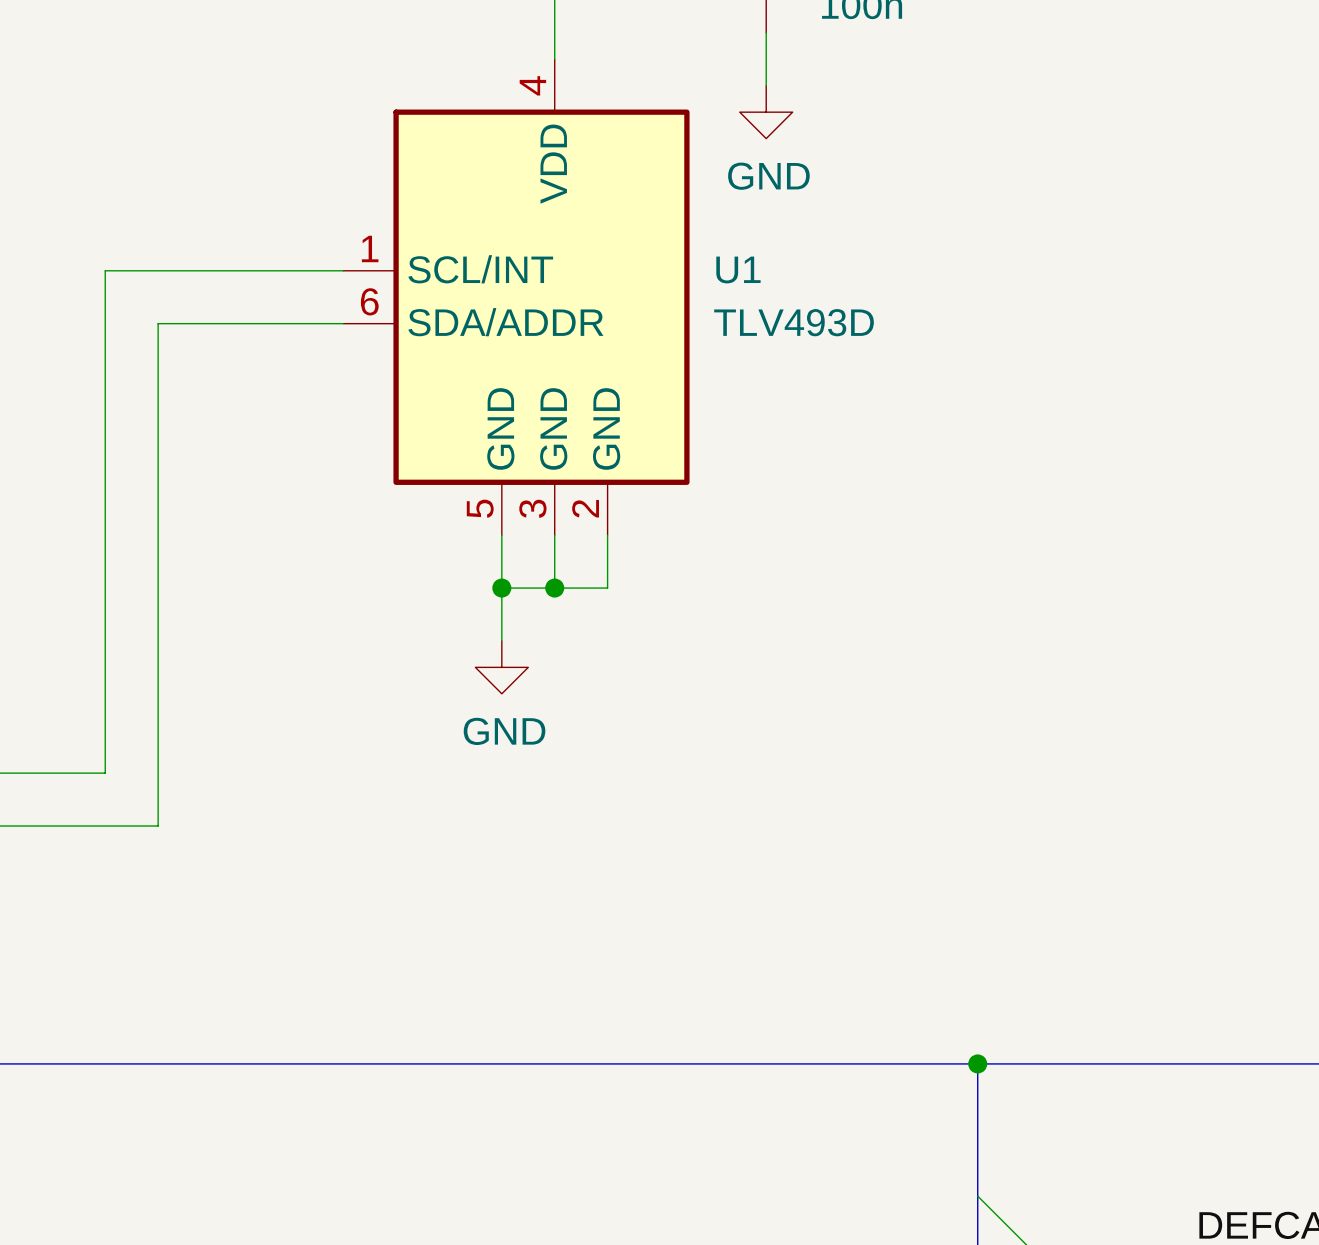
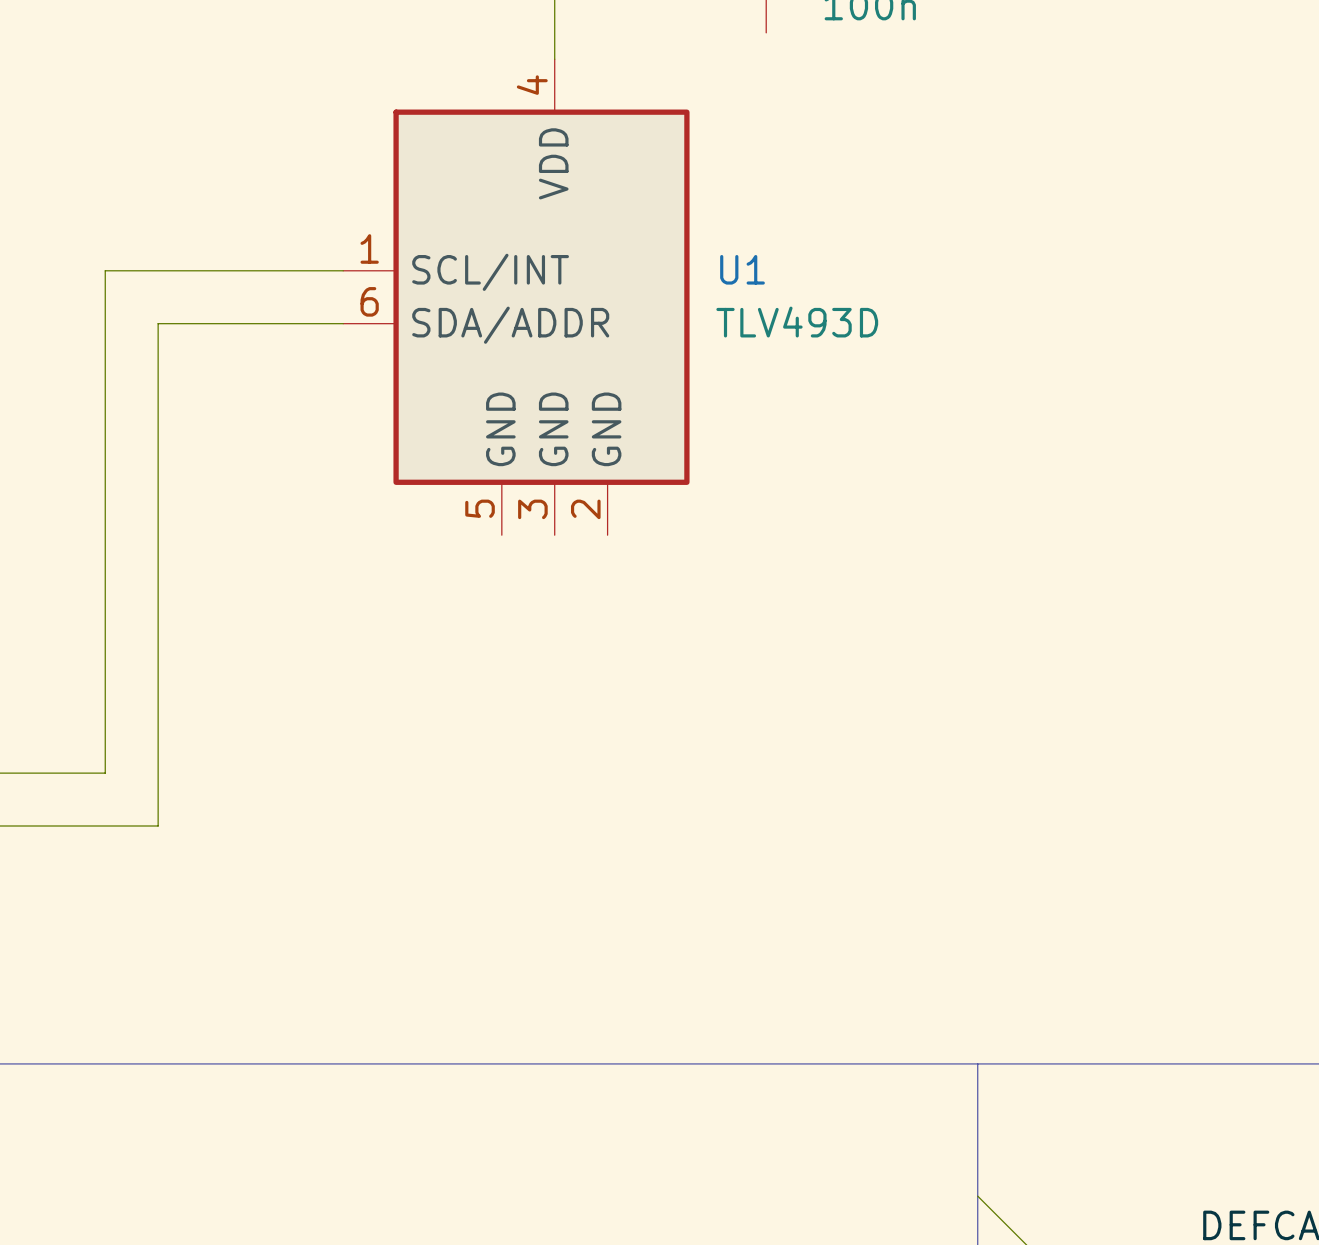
wire: (766, 32) (766, 85) -> none
power symbol: GND (766, 112) -> none
wire: (501, 535) (501, 640) -> none
wire: (554, 535) (554, 588) -> none
wire: (607, 535) (607, 588) (501, 588) -> none
junction: (501, 588) -> none
junction: (554, 588) -> none
power symbol: GND (501, 667) -> none
junction: (977, 1063) -> none

